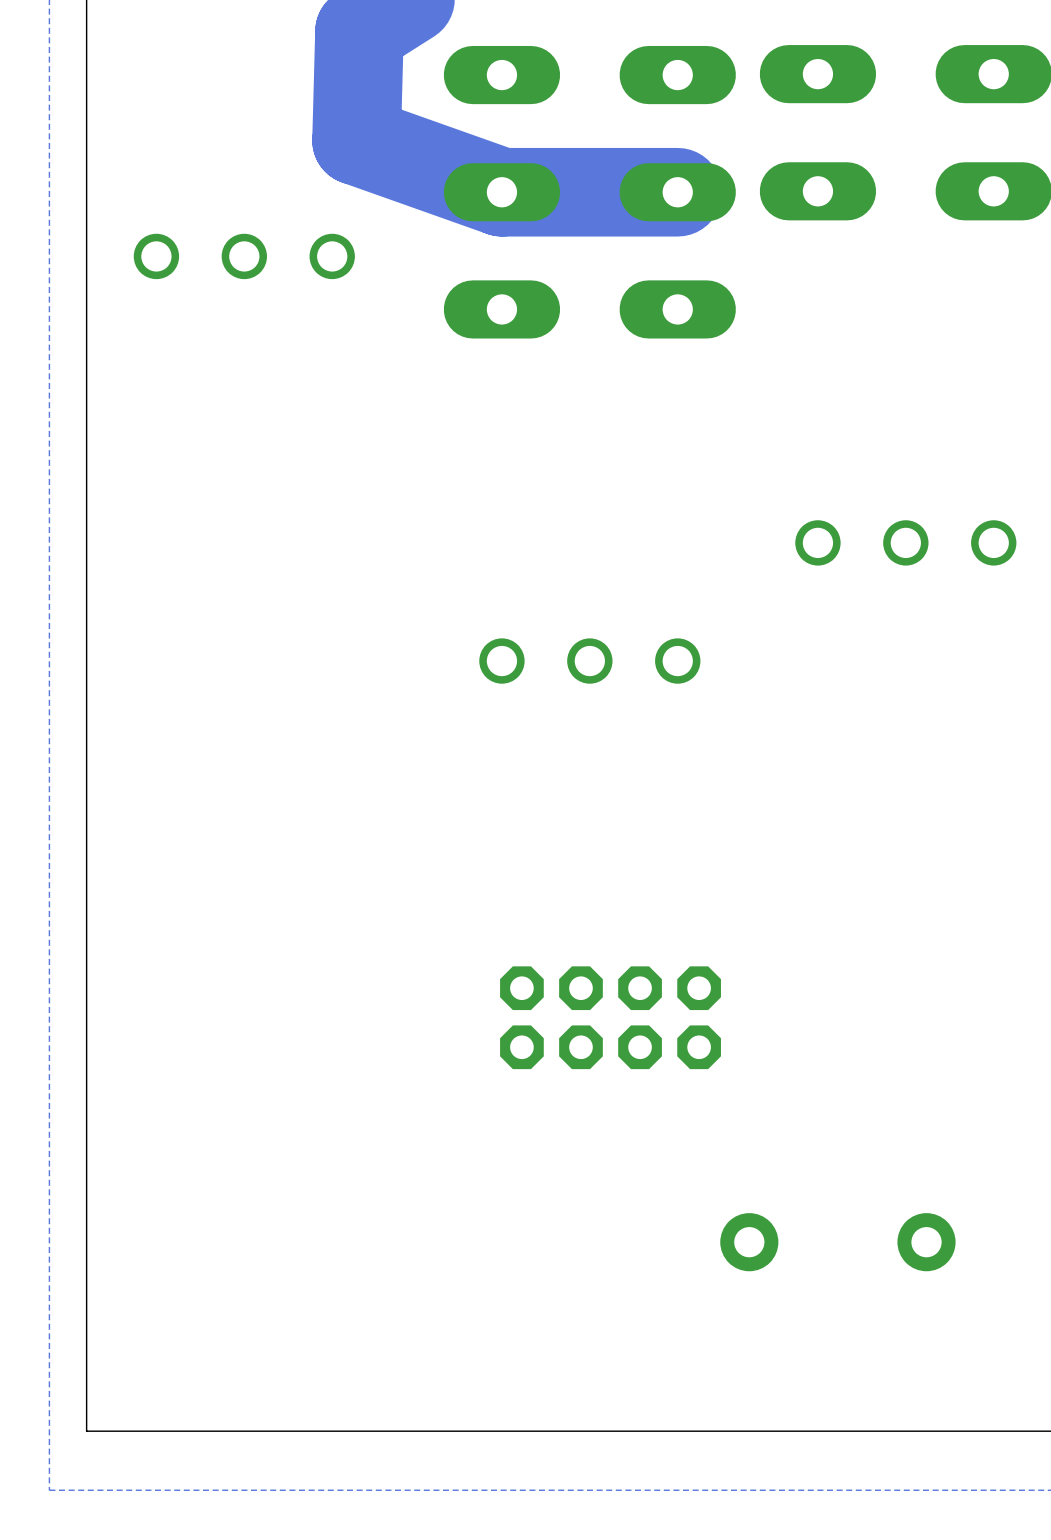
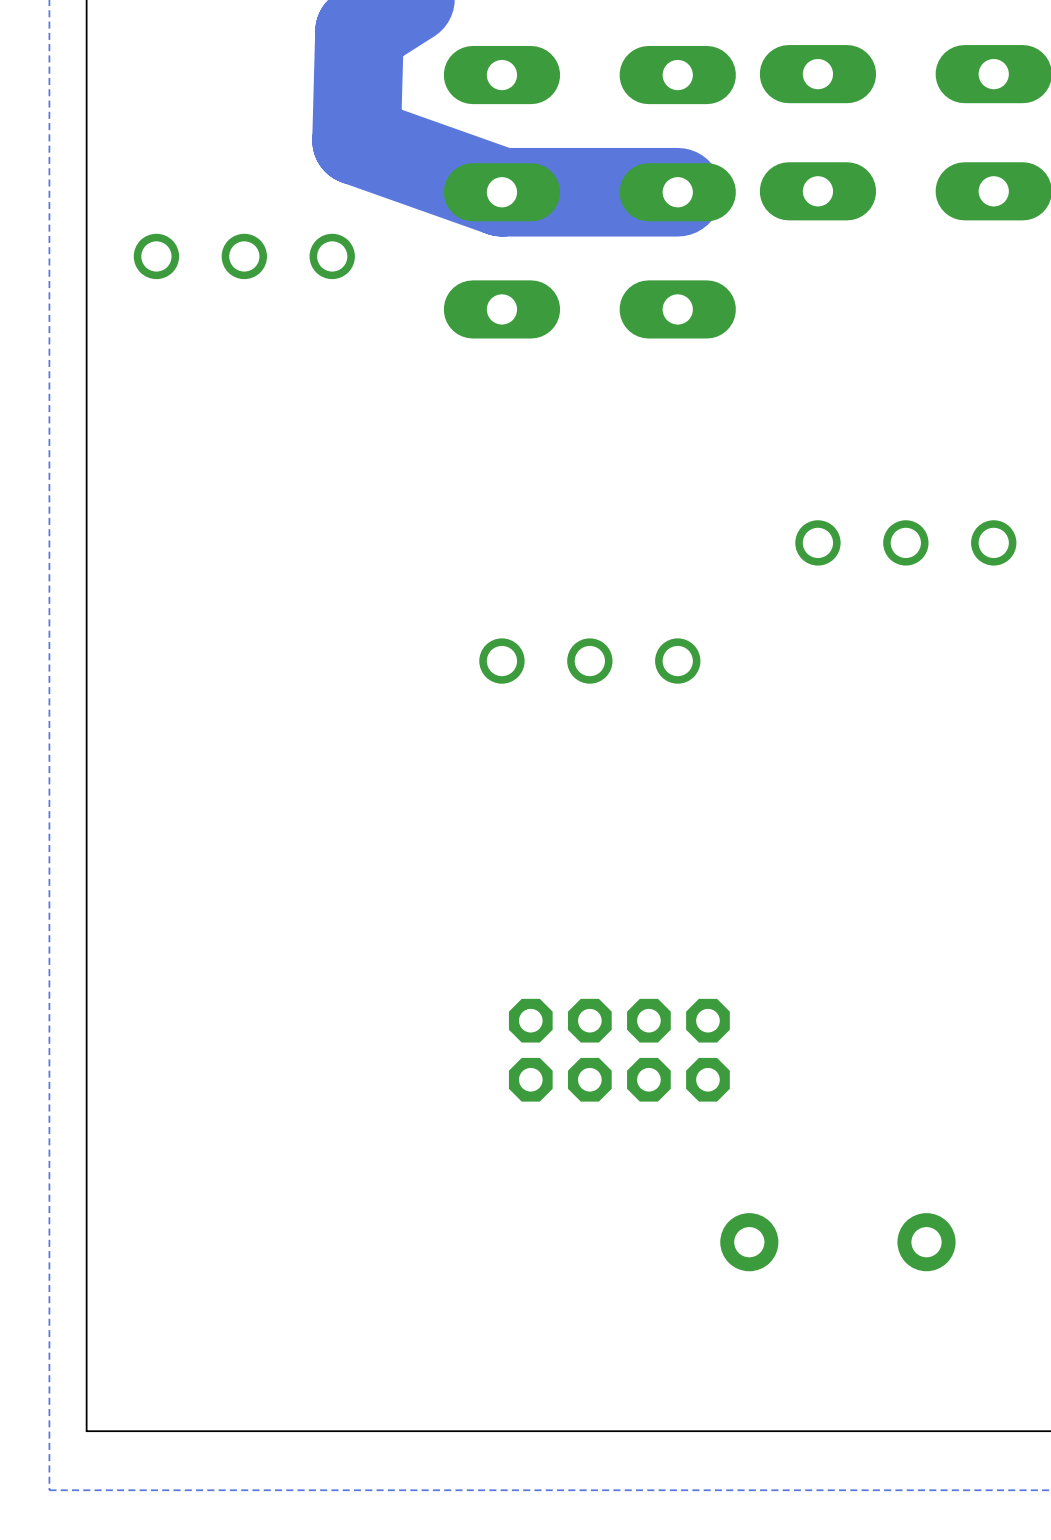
part position: (610, 1017) -> (619, 1050)

